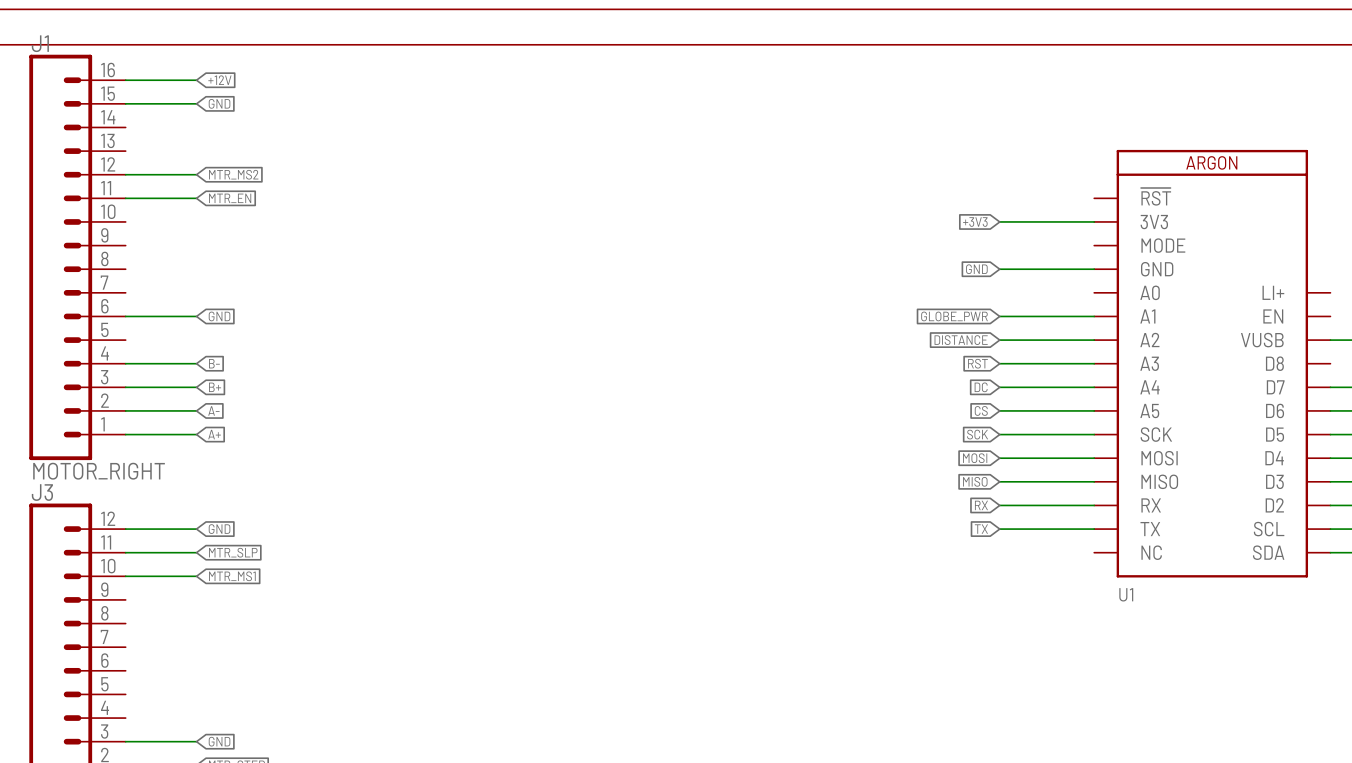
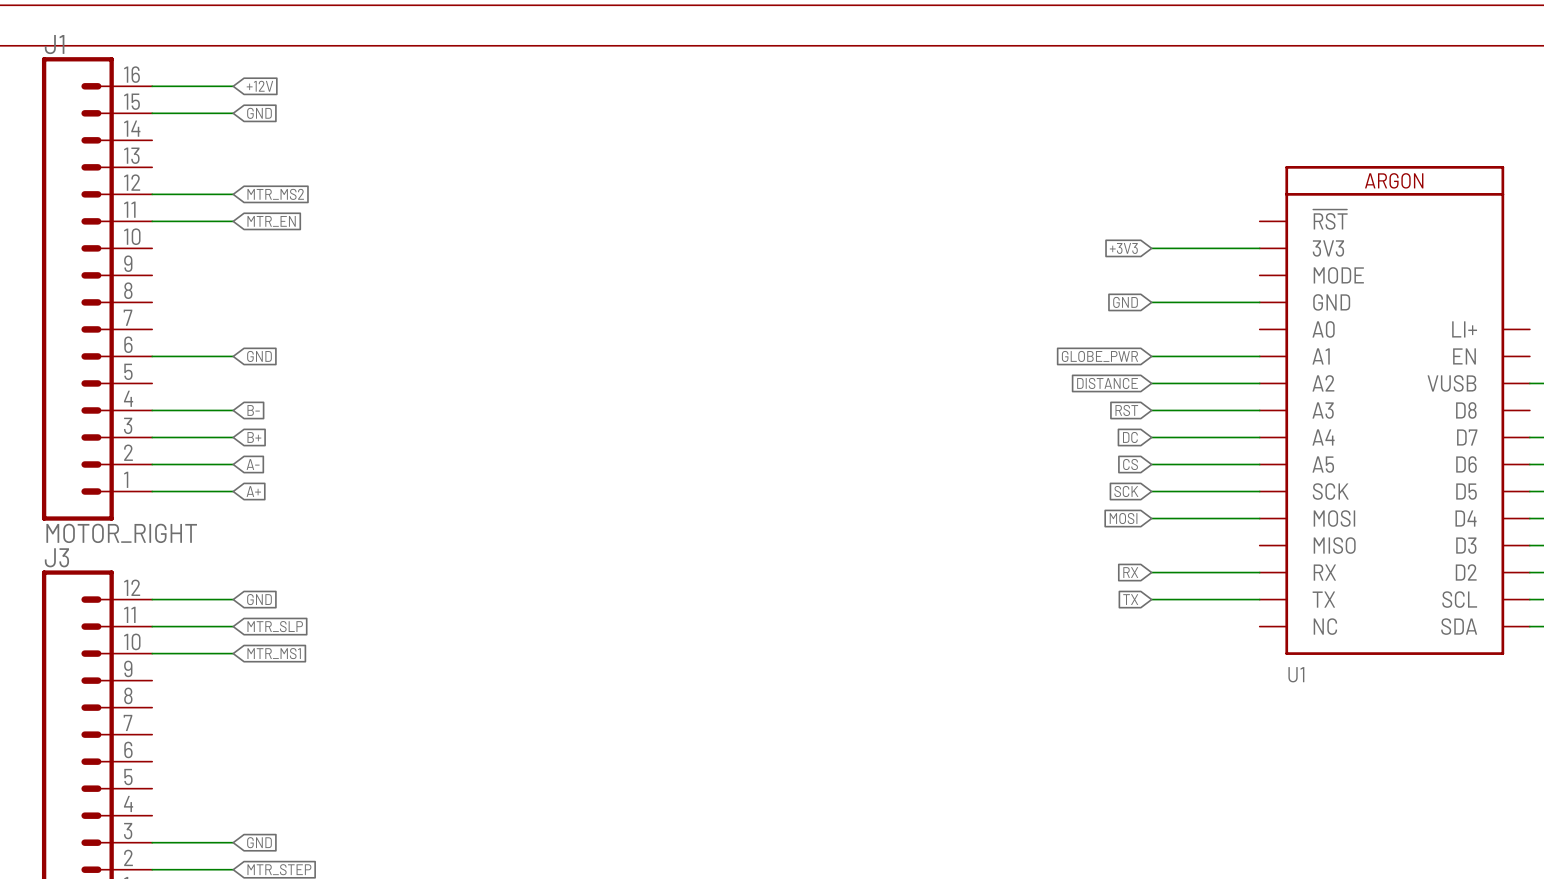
global label: MISO (975, 481) -> none
wire: (999, 481) (1094, 481) -> none

